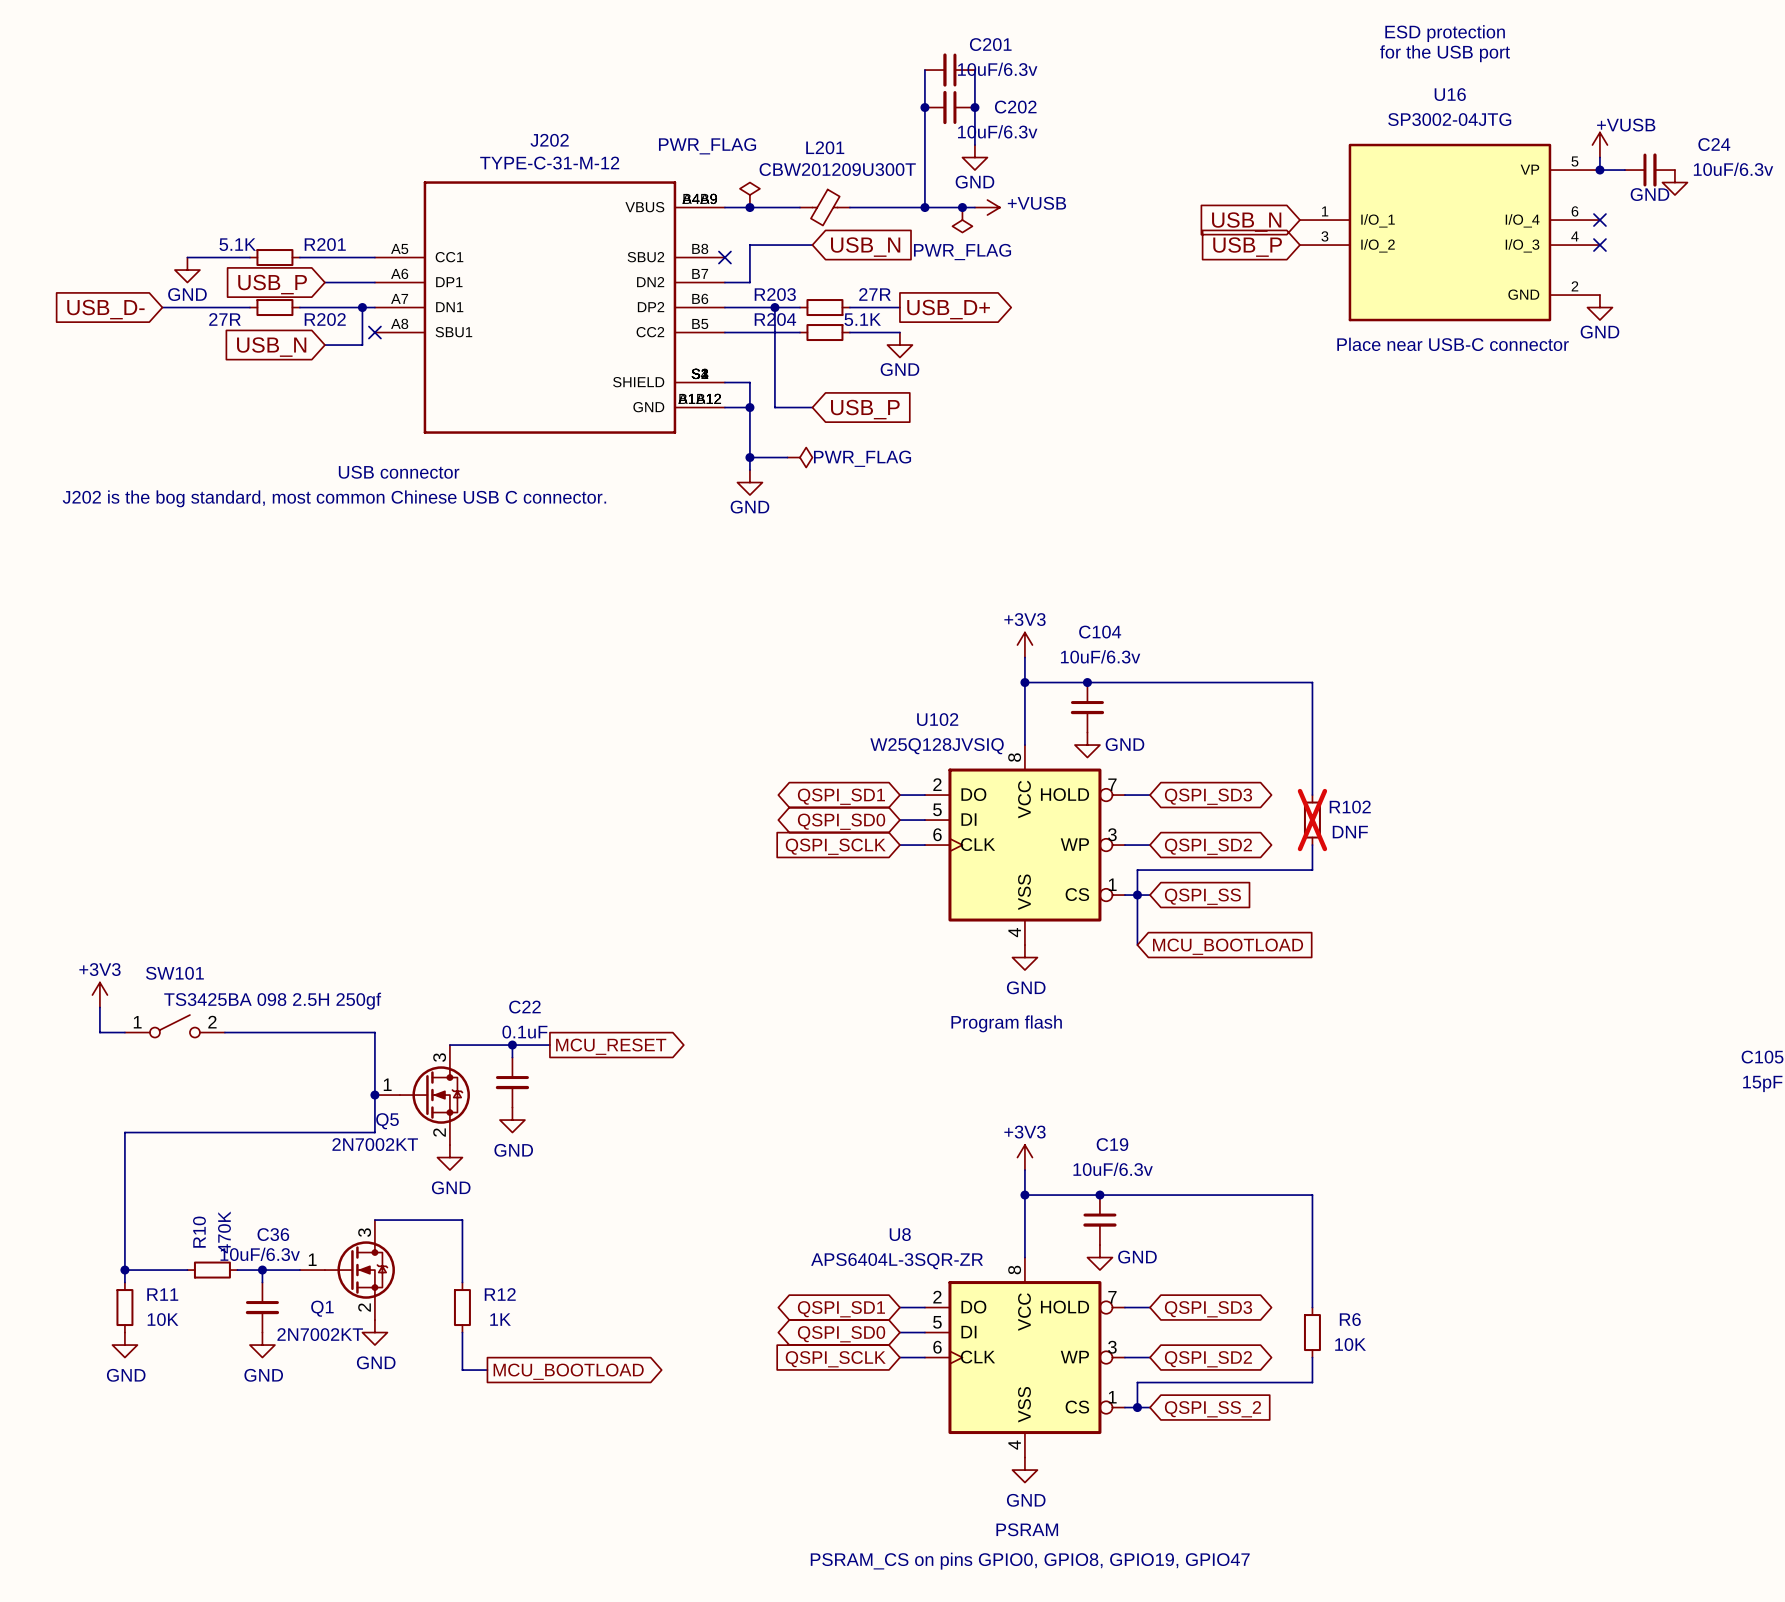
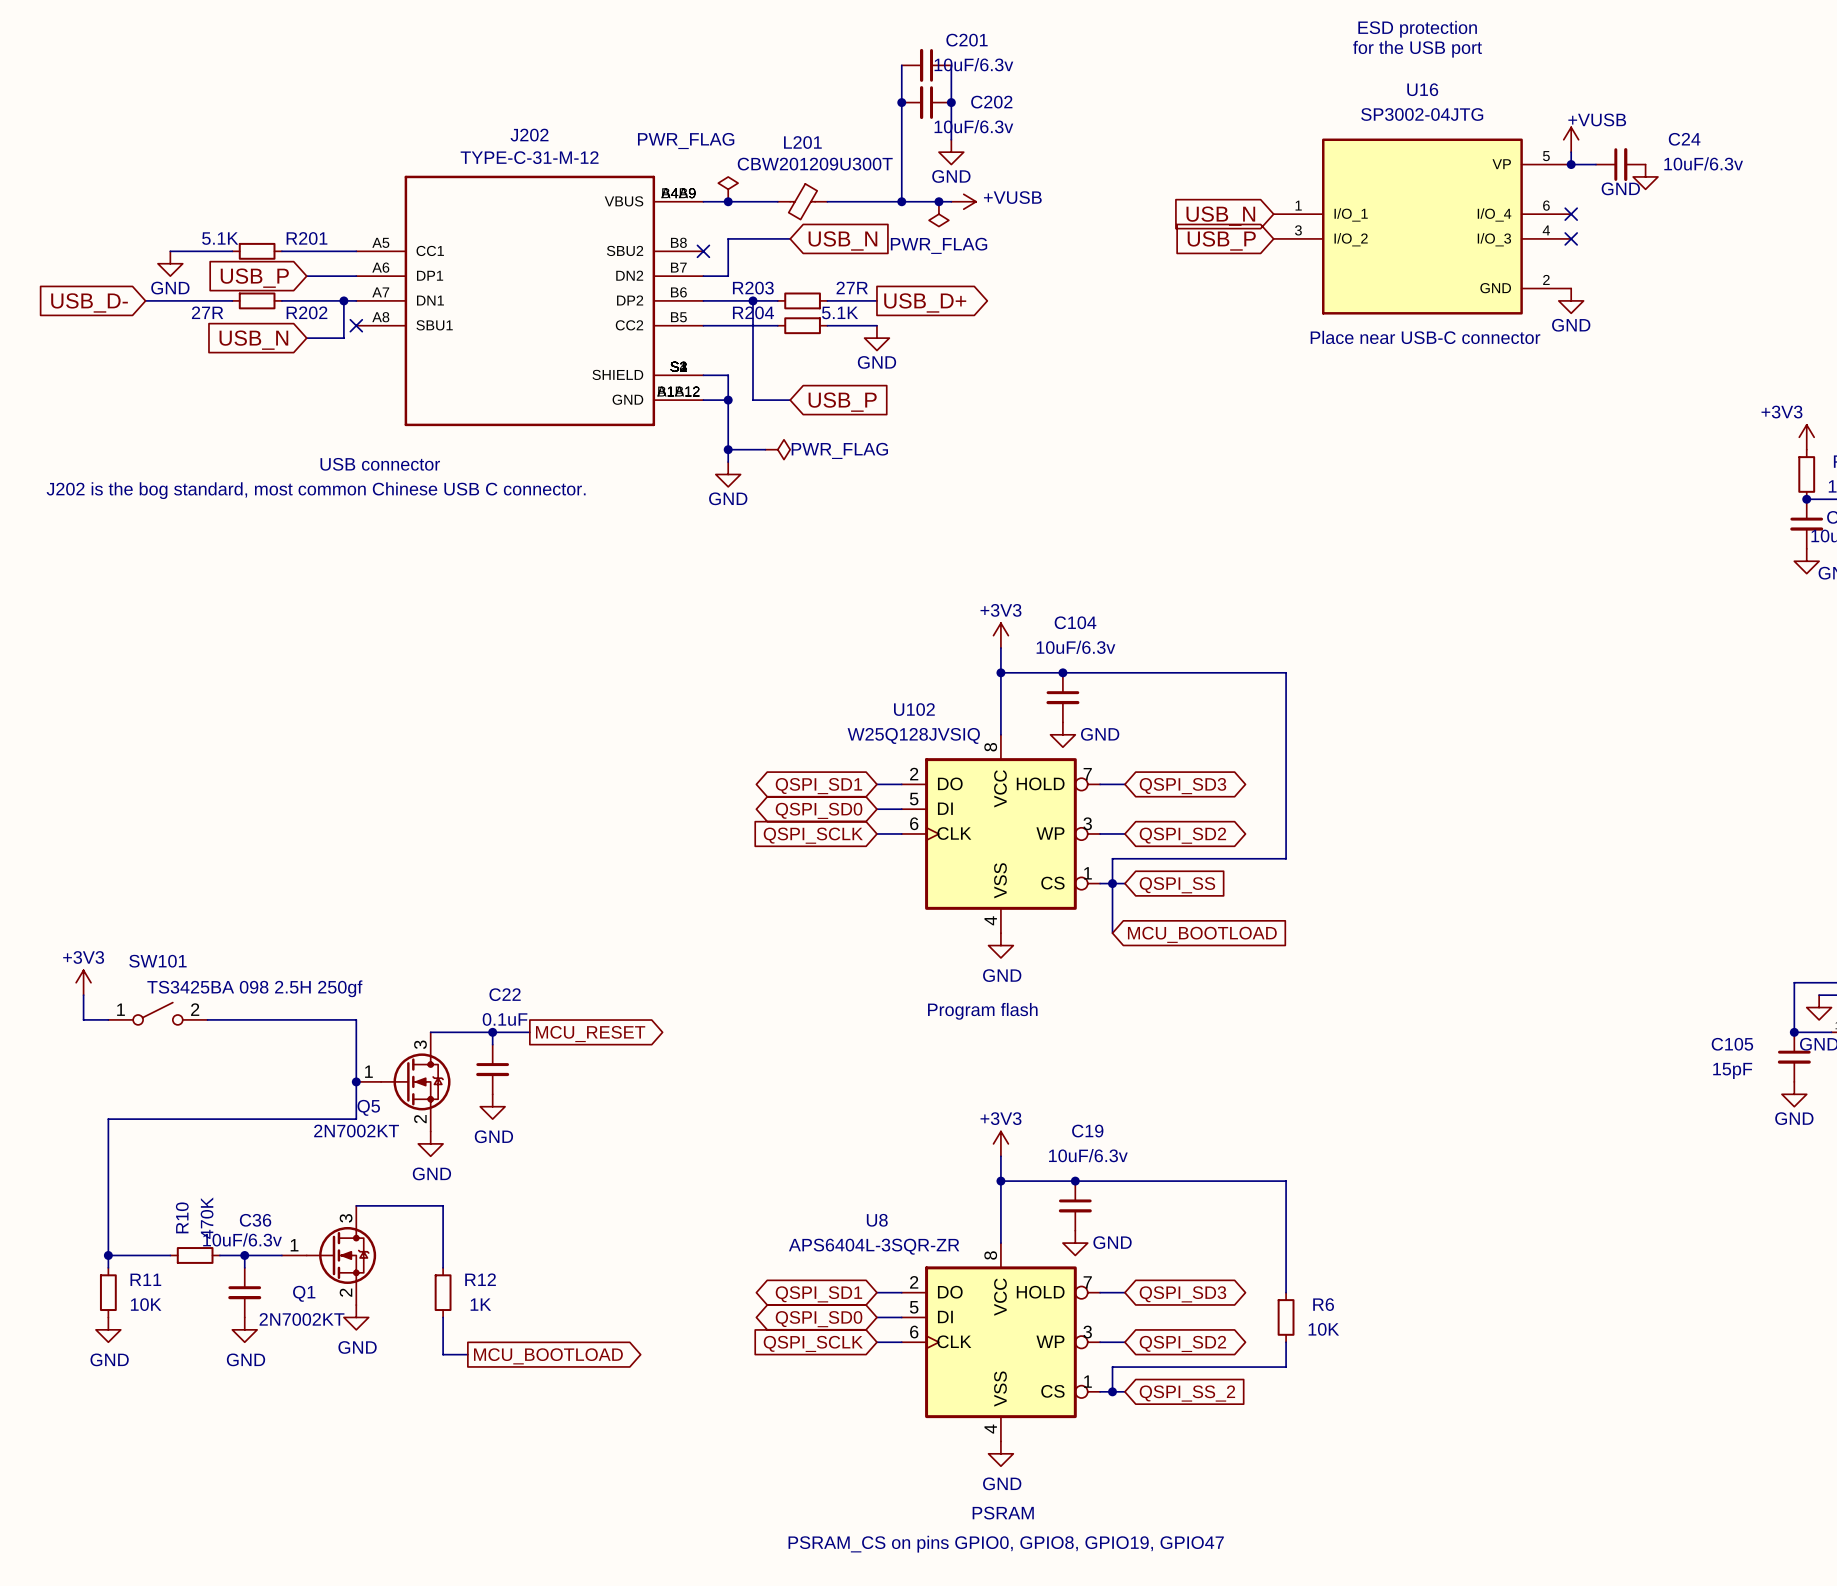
R102: DNF (1312, 820) -> none

